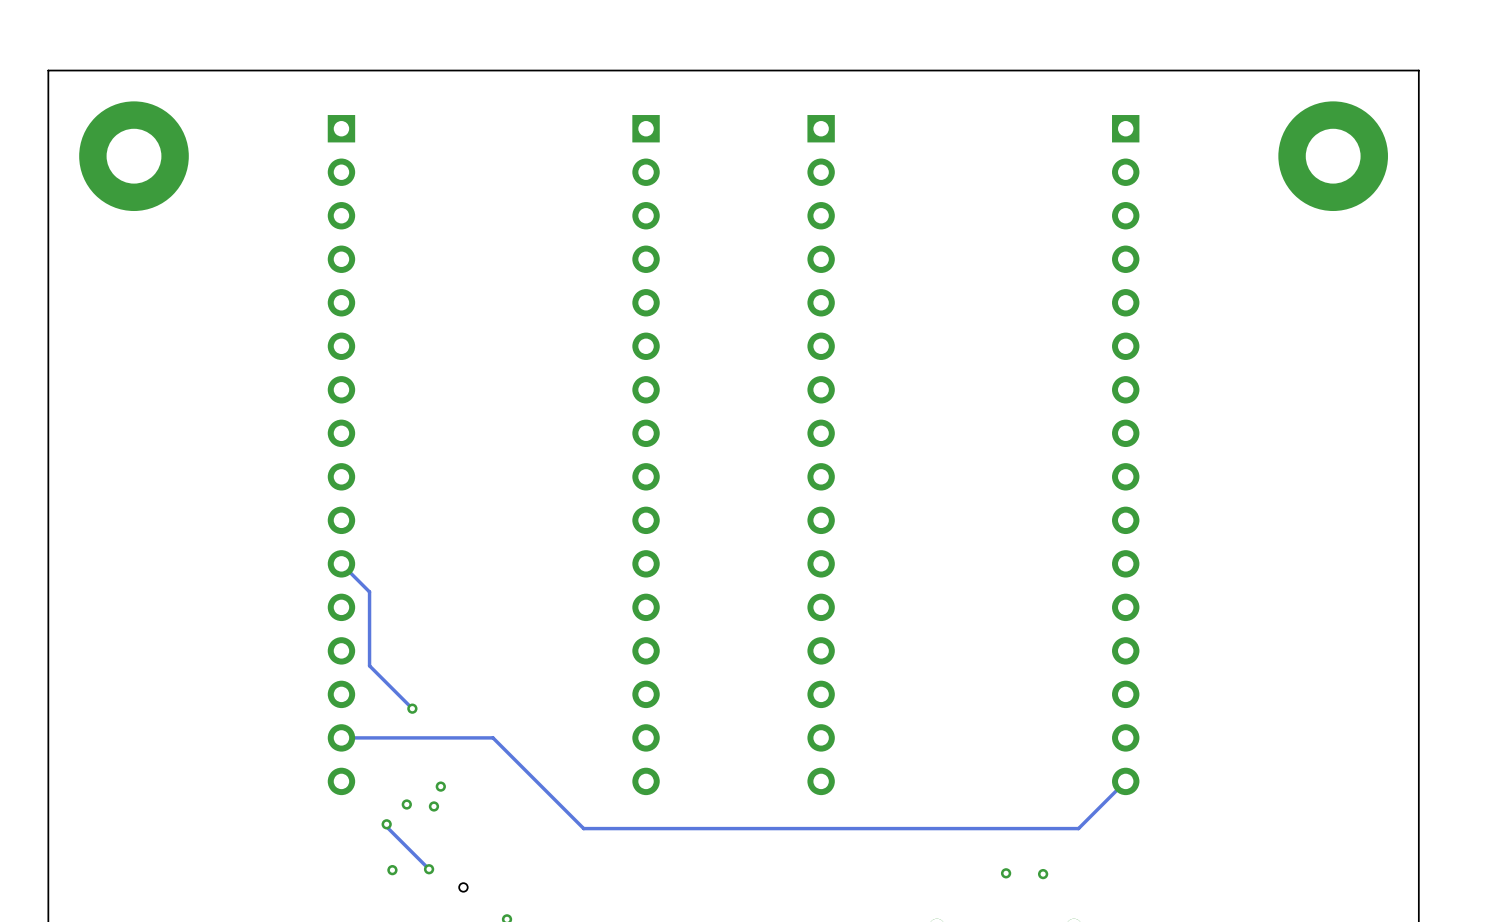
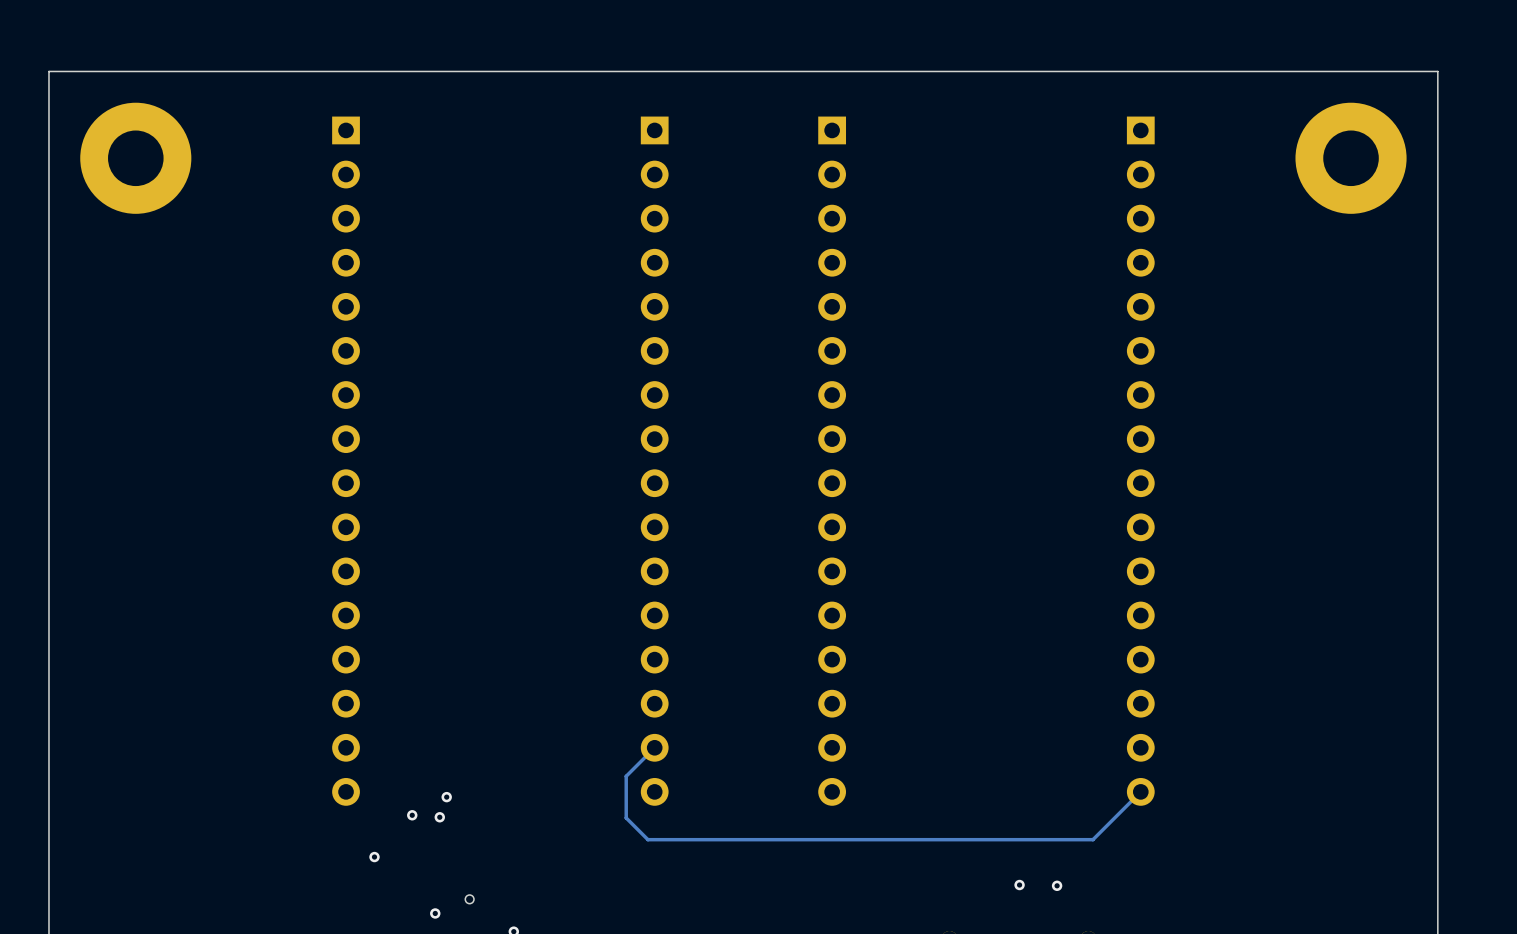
track: (341, 563) (369, 591) (369, 665) (412, 708) -> none
via: (412, 708) -> none
track: (341, 737) (493, 737) (583, 828) (639, 828) -> (654, 747) (626, 776) (626, 817) (647, 839)
track: (386, 824) (386, 826) (429, 869) -> none
via: (386, 824) -> none
via: none -> (374, 857)
via: (429, 869) -> none
via: (392, 870) -> none
via: none -> (435, 913)

